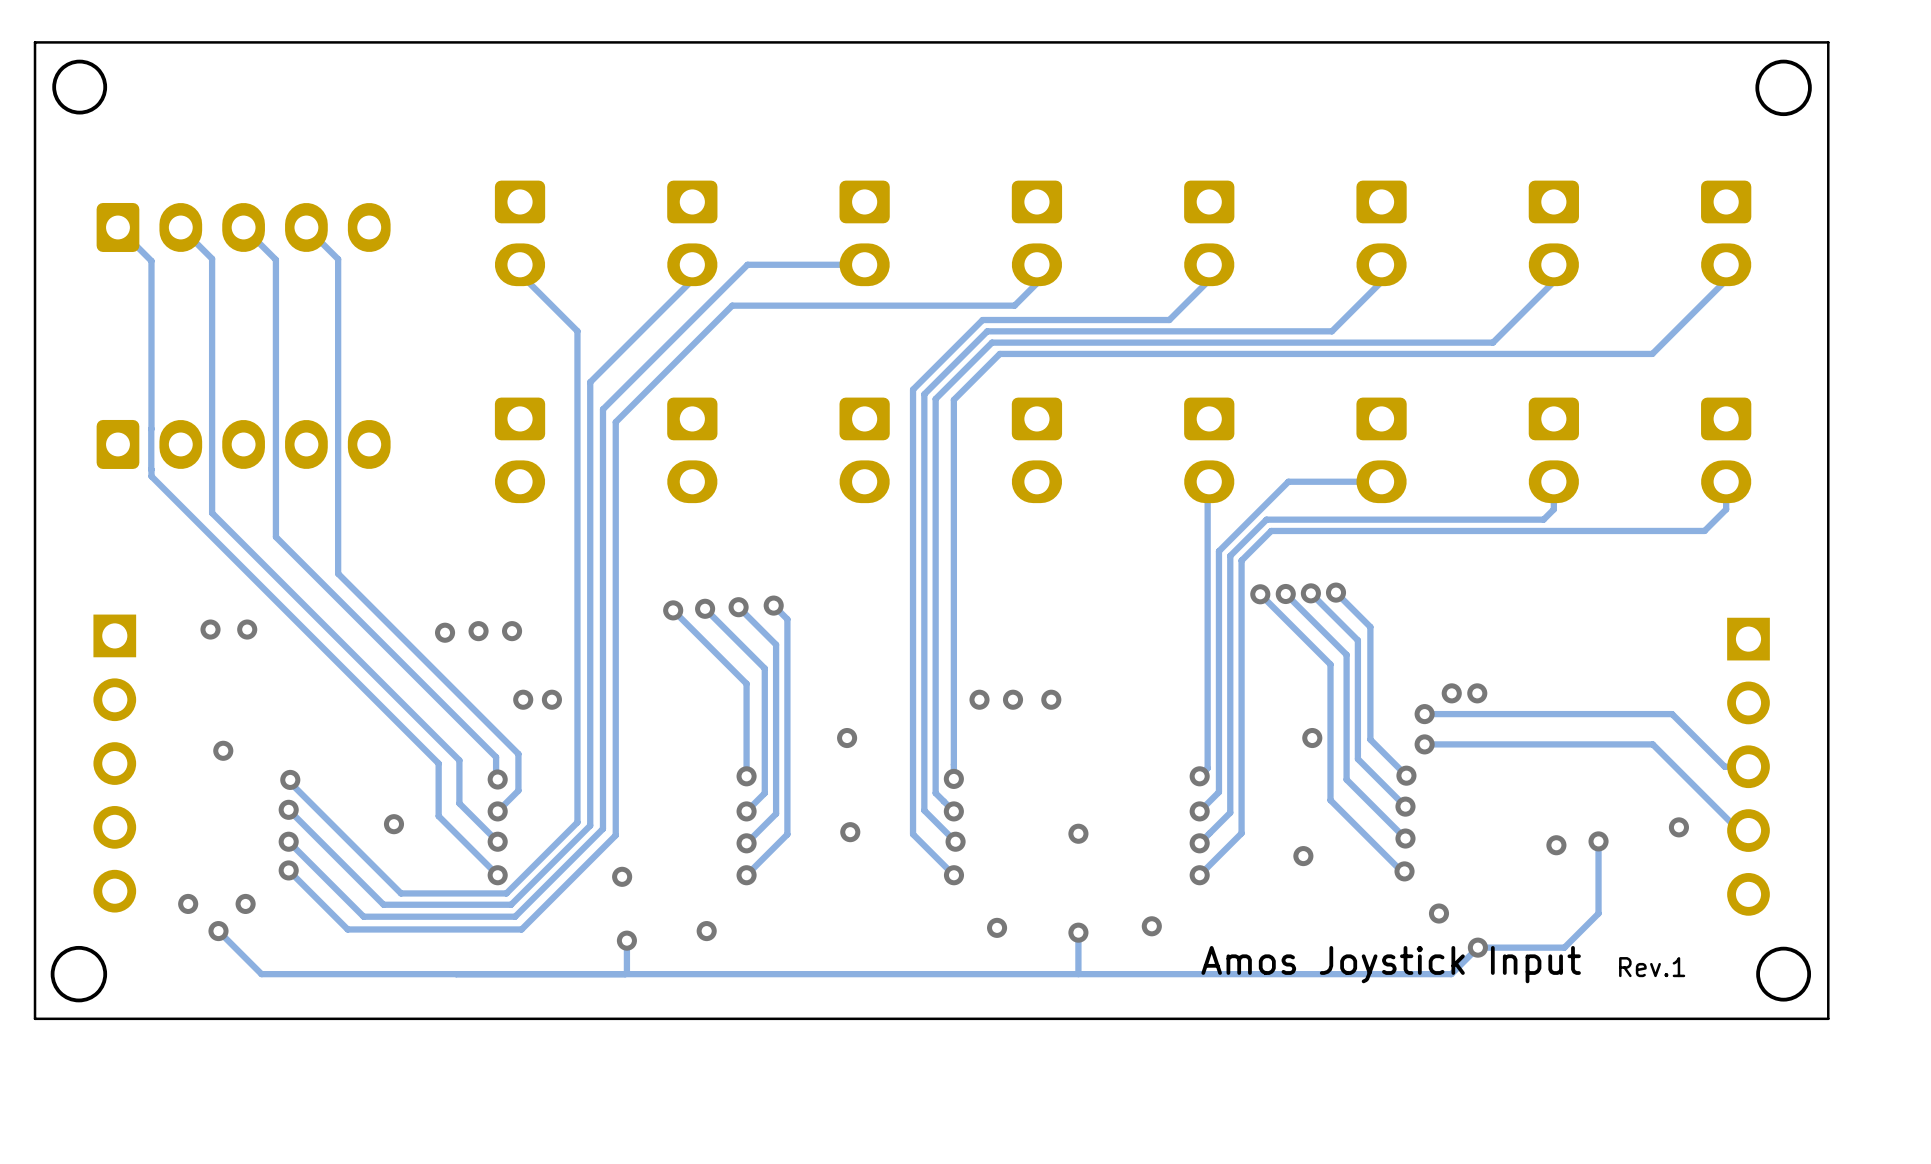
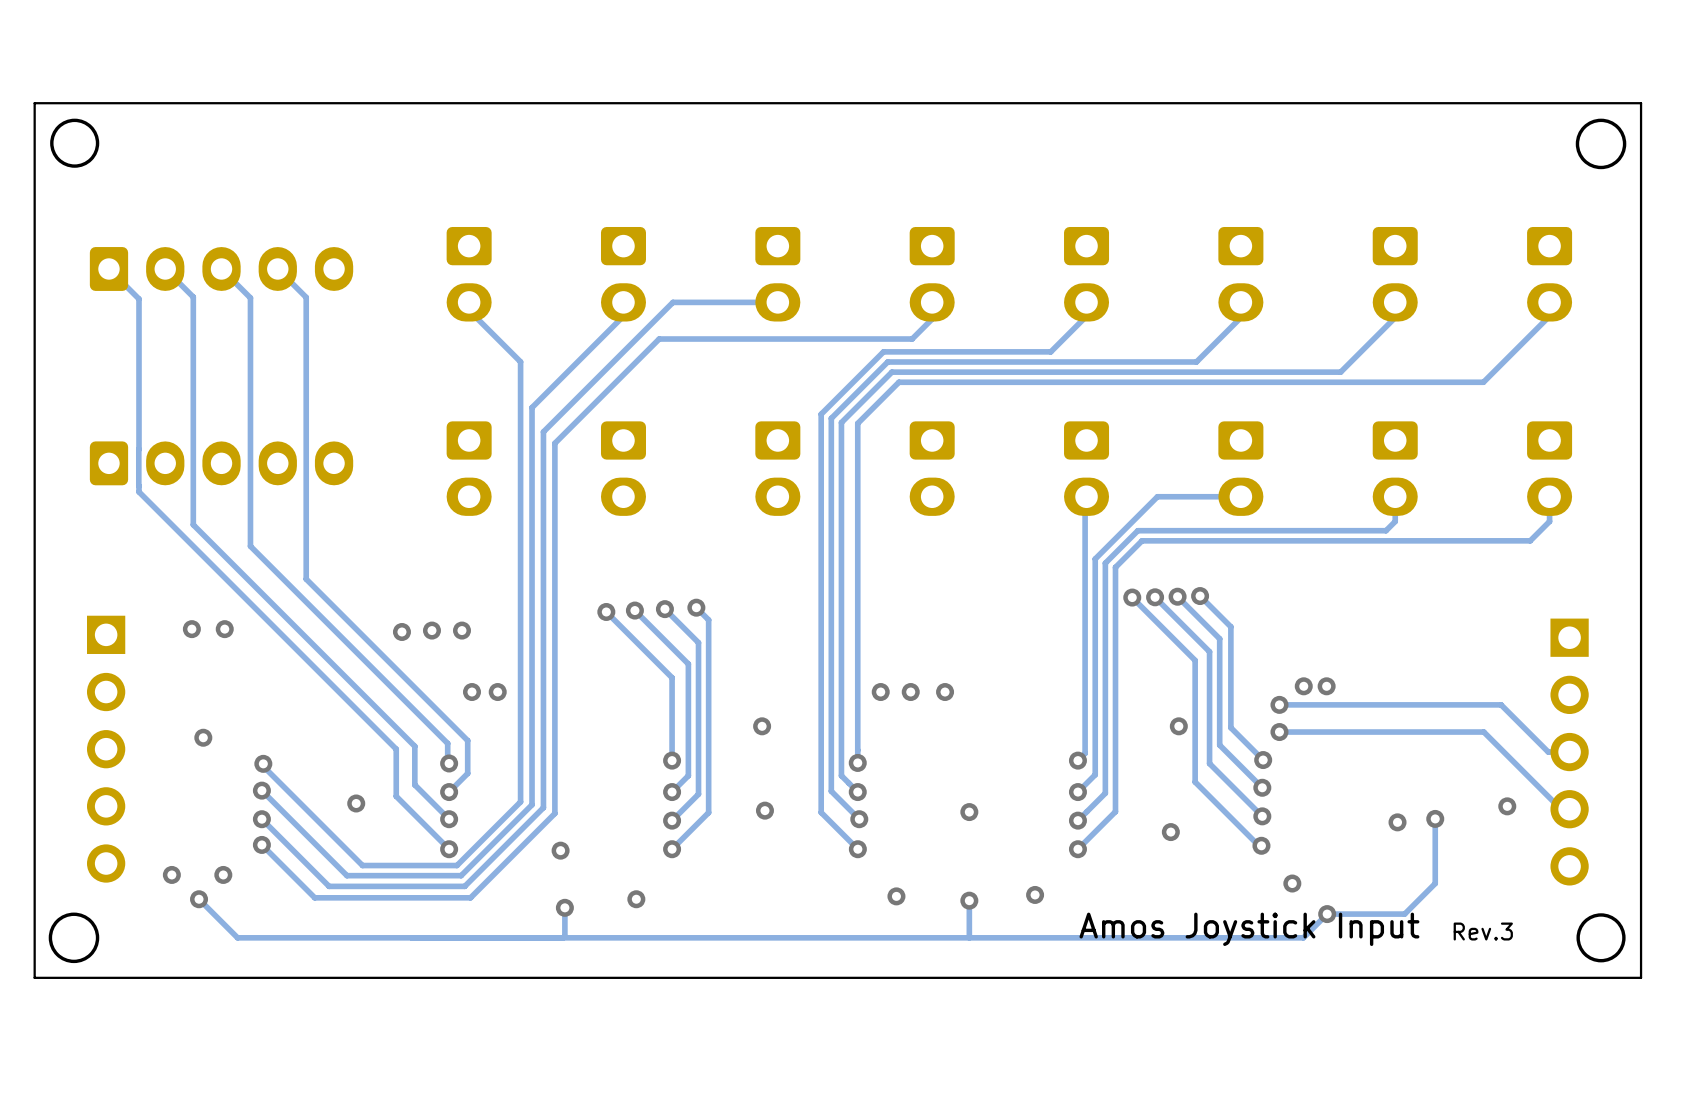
text: Rev.1 (1652, 967) -> Rev.3 (1483, 931)

